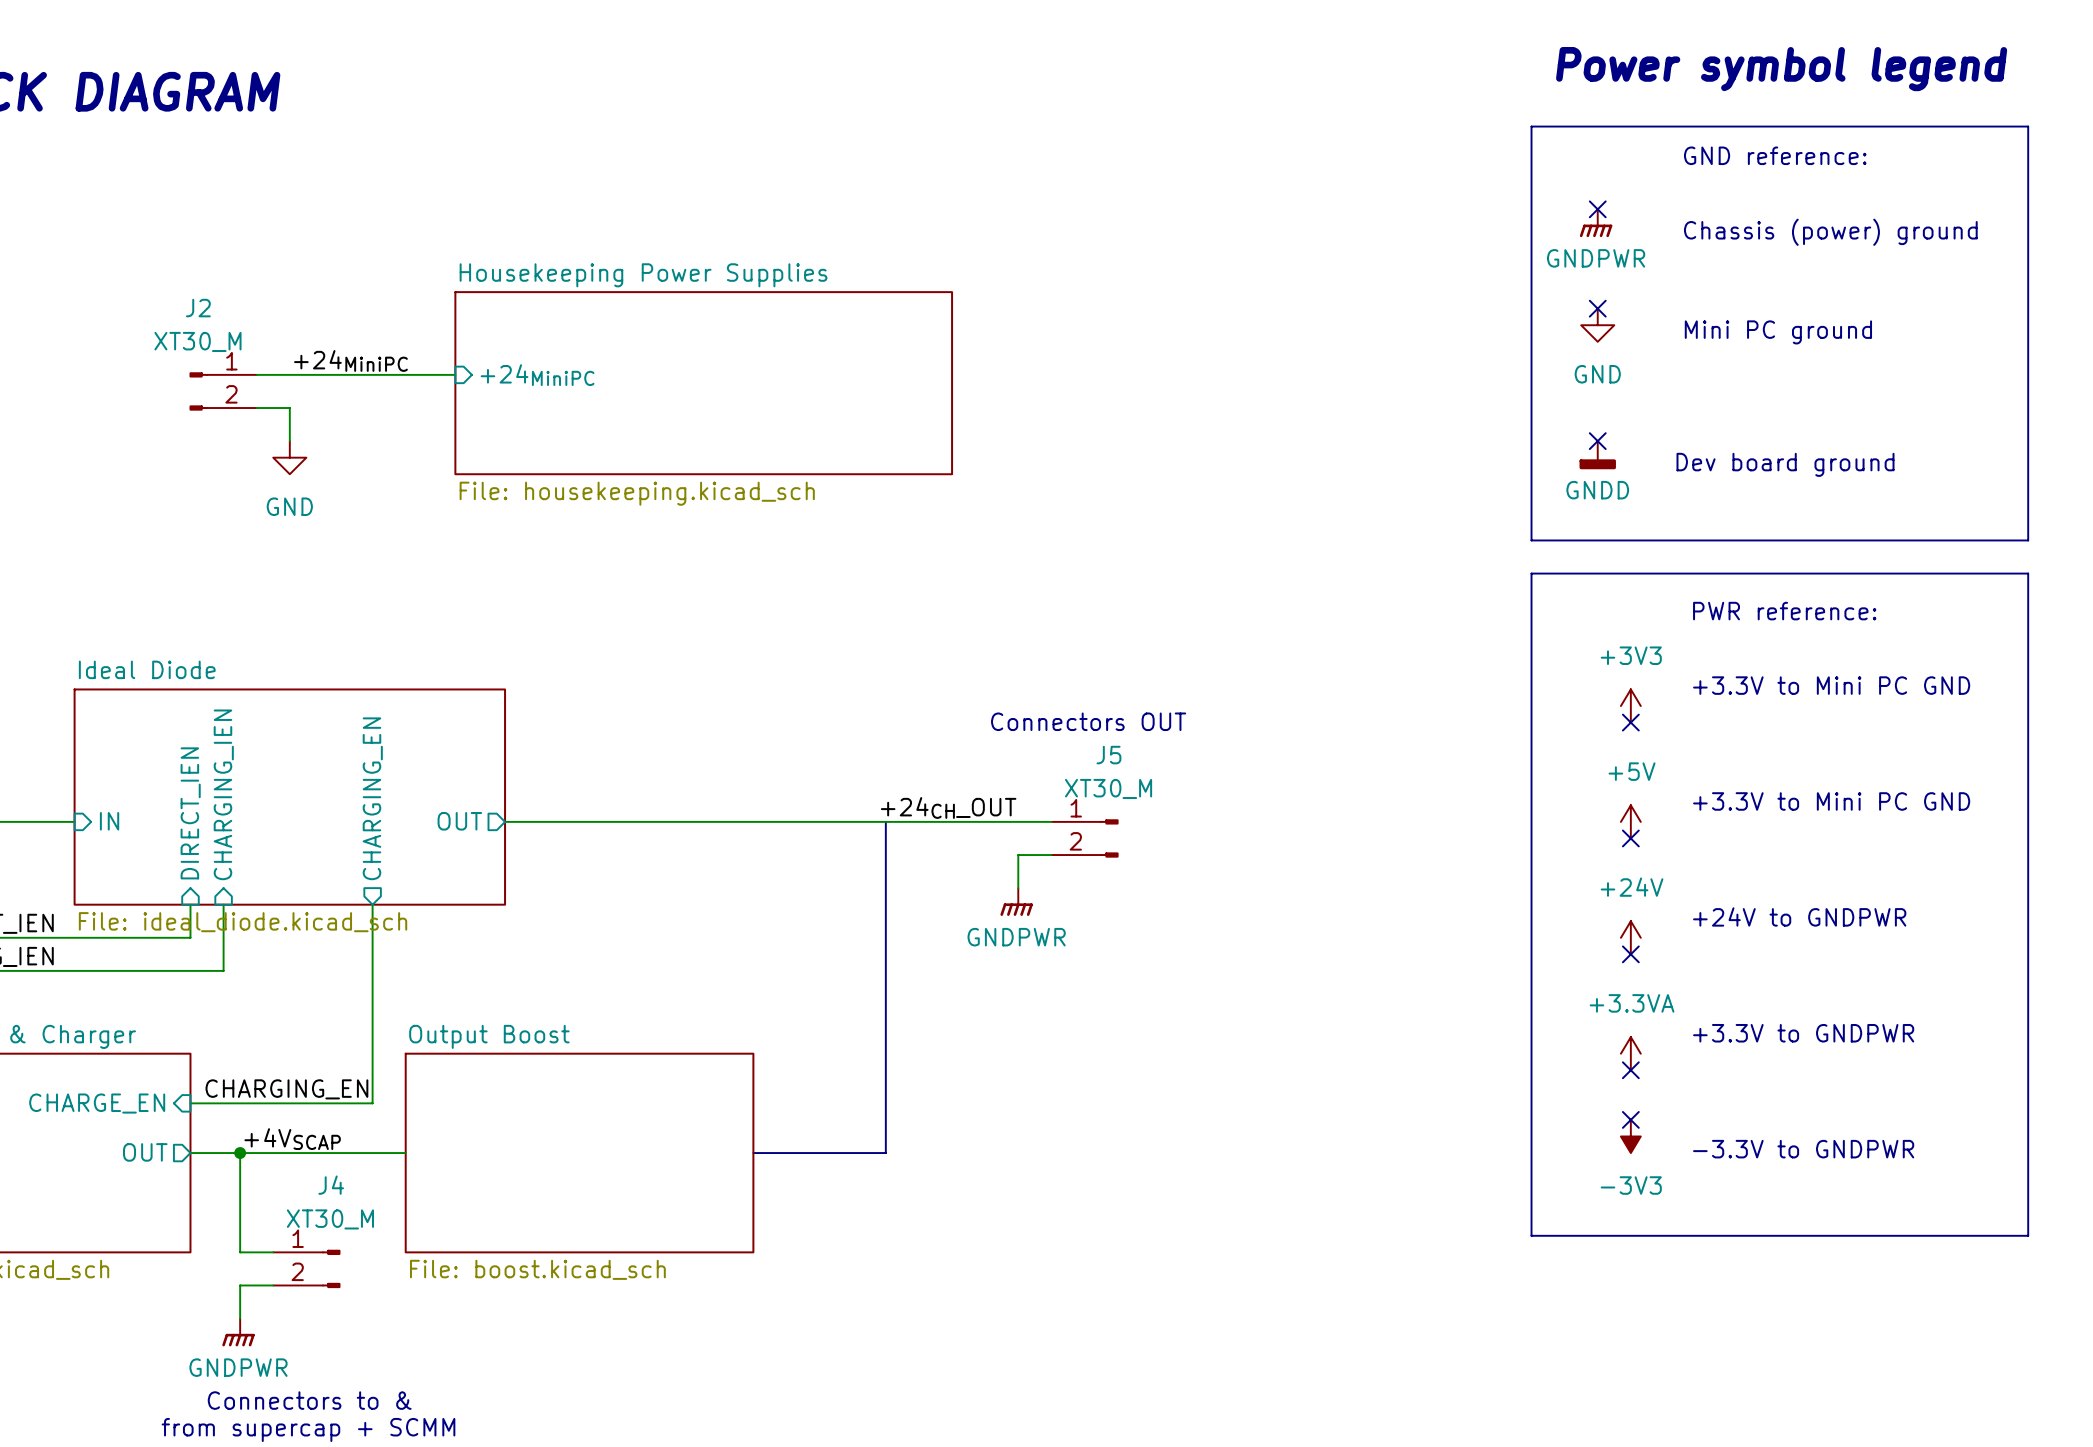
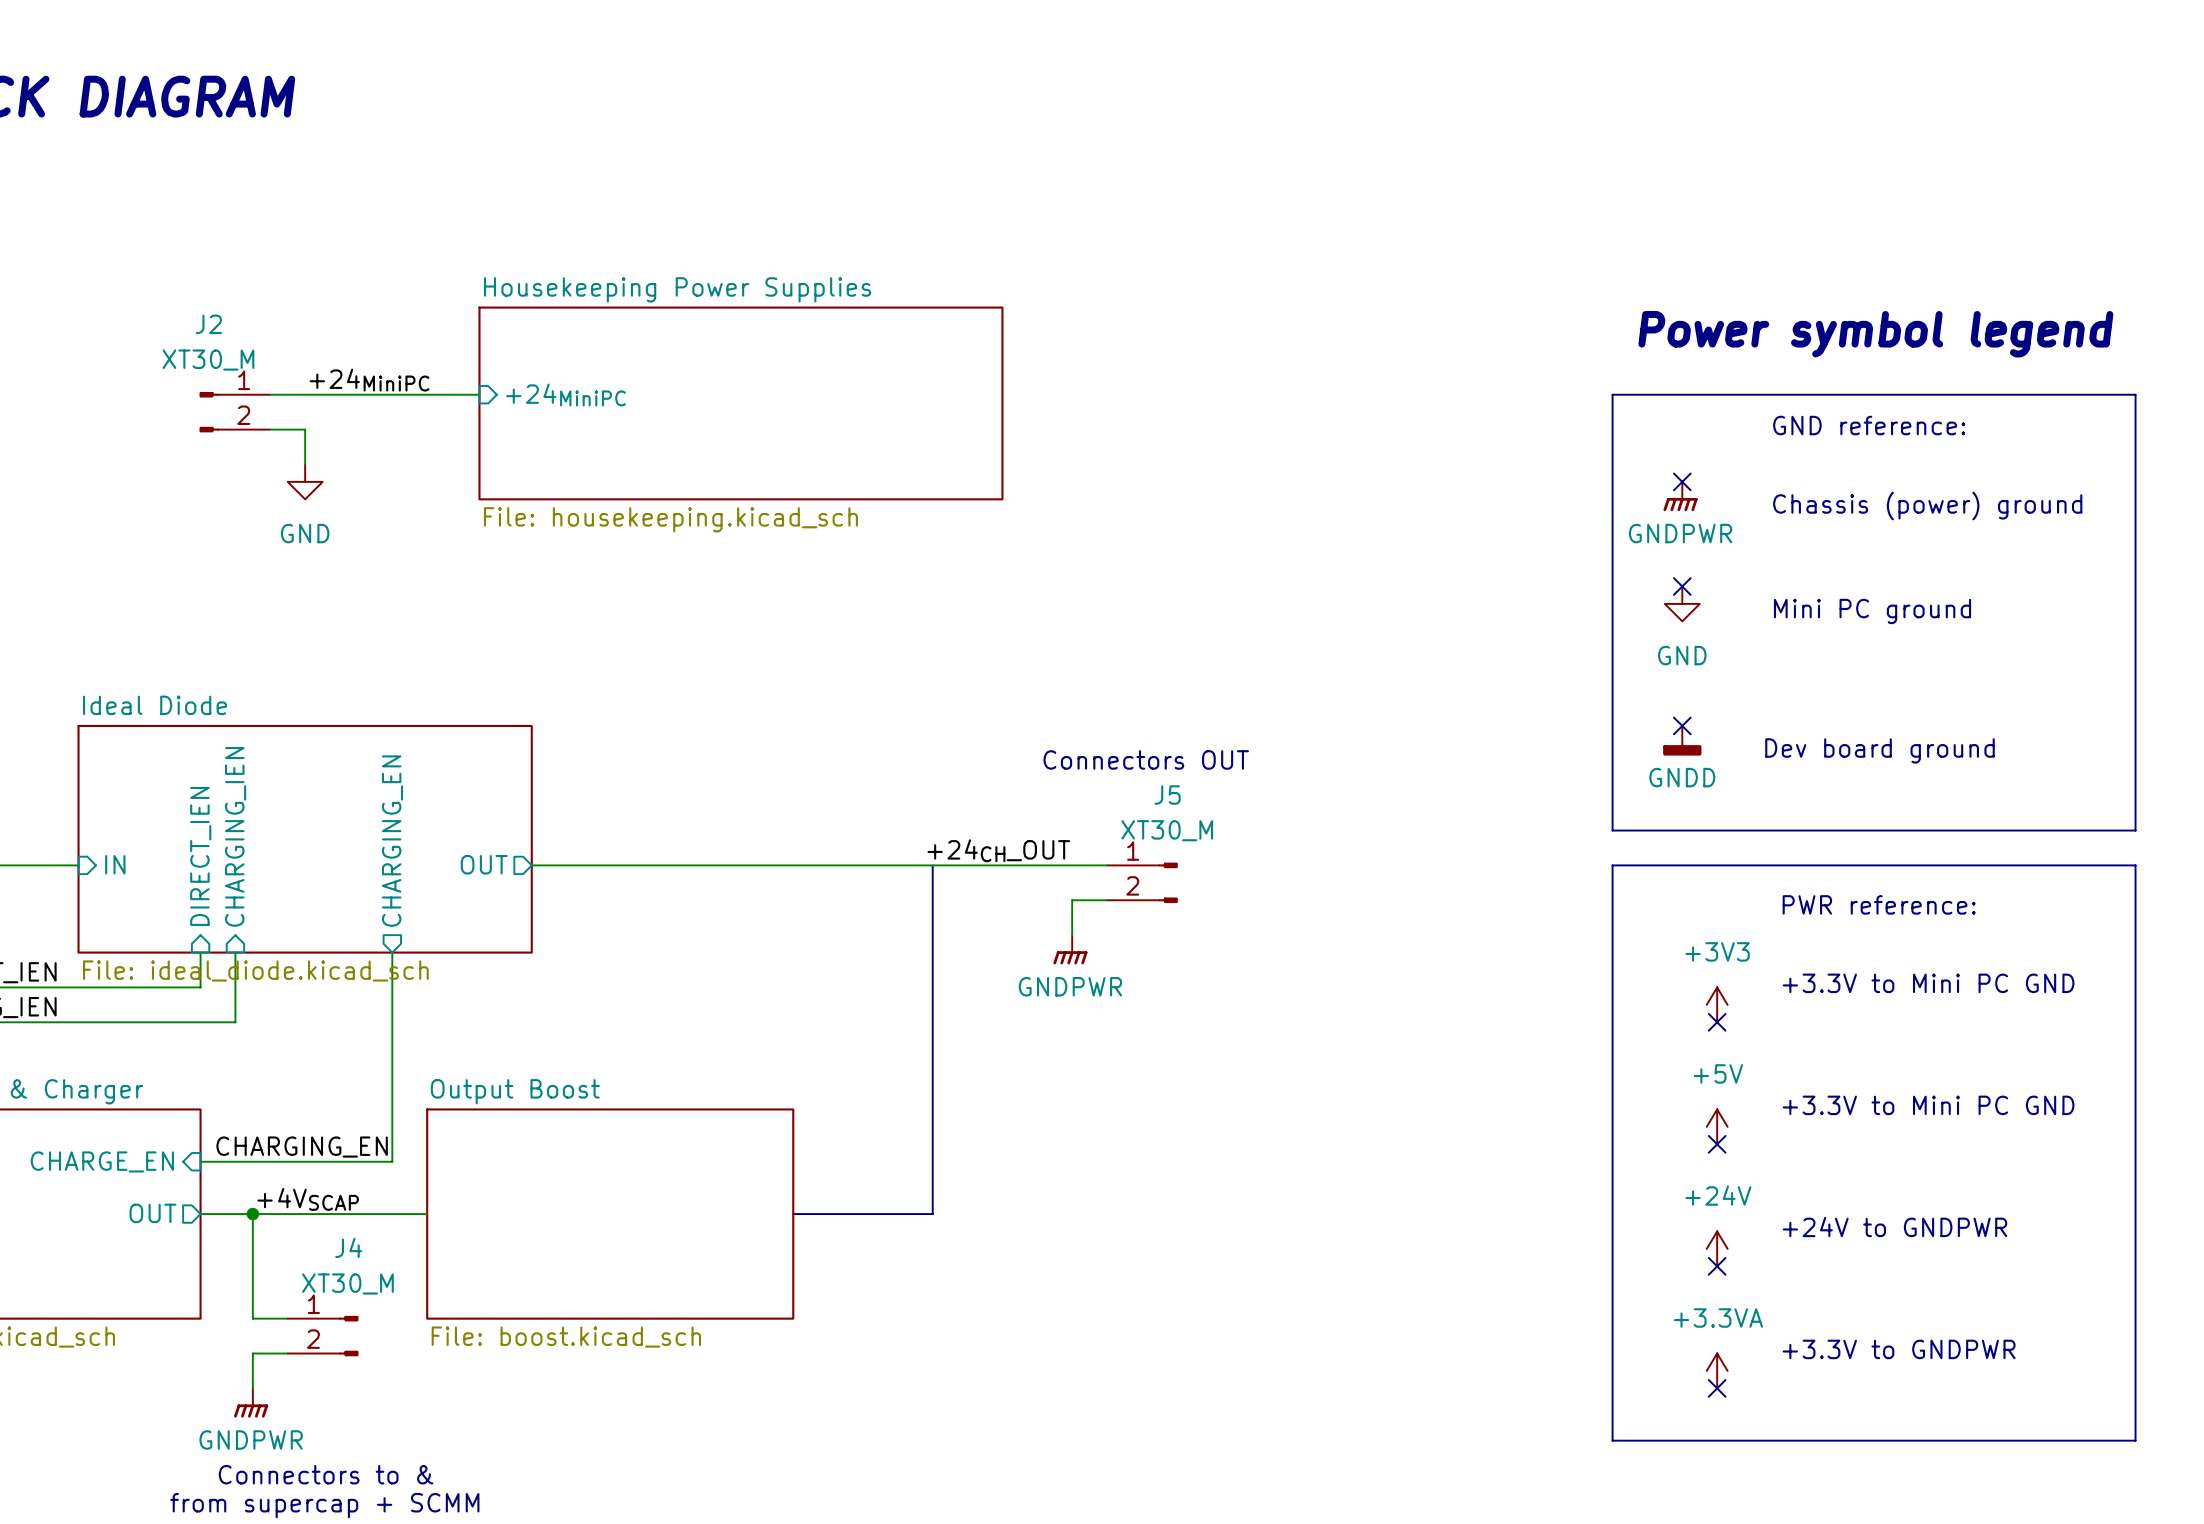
text position: Power symbol legend (1781, 69) -> Power symbol legend (1875, 334)
text position: GND reference: (1775, 155) -> GND reference: (1869, 425)
no-connect mark: (1597, 209) -> none
power symbol position: GNDPWR (1596, 223) -> GNDPWR (1680, 496)
text position: Chassis (power) ground (1830, 232) -> Chassis (power) ground (1927, 506)
no-connect mark: (1597, 308) -> none
power symbol position: GND (1597, 325) -> GND (1682, 603)
text position: Mini PC ground (1778, 332) -> Mini PC ground (1872, 611)
line: (1531, 374) (1531, 126) (2028, 126) (2028, 374) -> (1612, 394) (2135, 394)
no-connect mark position: (1597, 441) -> (1682, 481)
power symbol position: GNDD (1597, 455) -> GNDD (1682, 740)
text position: Dev board ground (1785, 464) -> Dev board ground (1880, 750)
line: (1531, 540) (2028, 540) -> (1612, 569) (1612, 603)
no-connect mark: none -> (1682, 586)
line: (1531, 573) (2028, 573) -> (2135, 569) (2135, 603)
text position: PWR reference: (1784, 611) -> PWR reference: (1879, 904)
text: +3.3V to Mini PC GND (1831, 685) -> none
power symbol position: +3V3 (1630, 706) -> +3V3 (1717, 1004)
no-connect mark position: (1630, 722) -> (1682, 725)
line: (1531, 788) (1531, 821) -> (1612, 830) (2135, 830)
line: (2028, 788) (2028, 821) -> (1612, 865) (2135, 865)
text: +3.3V to Mini PC GND (1831, 801) -> none
power symbol position: +5V (1630, 821) -> +5V (1717, 1126)
no-connect mark: (1630, 838) -> none
text position: +24V to GNDPWR (1799, 916) -> +24V to GNDPWR (1894, 1226)
text: none -> +3.3V to Mini PC GND (1928, 983)
power symbol position: +24V (1630, 937) -> +24V (1717, 1248)
no-connect mark position: (1630, 954) -> (1717, 1022)
text position: +3.3V to GNDPWR (1803, 1033) -> +3.3V to GNDPWR (1899, 1349)
text: none -> +3.3V to Mini PC GND (1928, 1105)
power symbol position: +3.3VA (1630, 1053) -> +3.3VA (1717, 1370)
no-connect mark: (1630, 1070) -> none
no-connect mark: none -> (1717, 1144)
no-connect mark: (1630, 1119) -> none
power symbol: -3V3 (1630, 1136) -> none
text: -3.3V to GNDPWR (1803, 1149) -> none
no-connect mark: none -> (1717, 1266)
line: (1531, 1235) (2028, 1235) -> (1612, 1301) (1612, 1440) (2135, 1440) (2135, 1301)
no-connect mark: none -> (1717, 1388)

